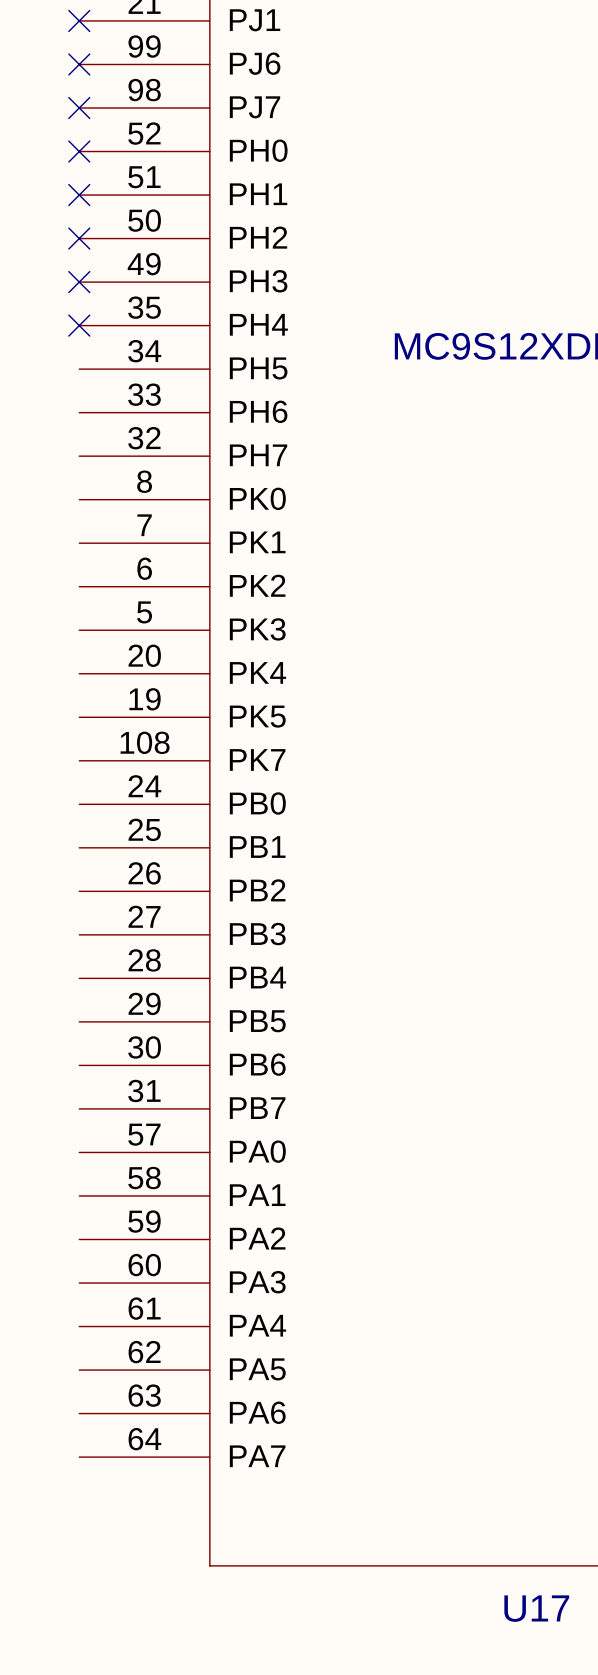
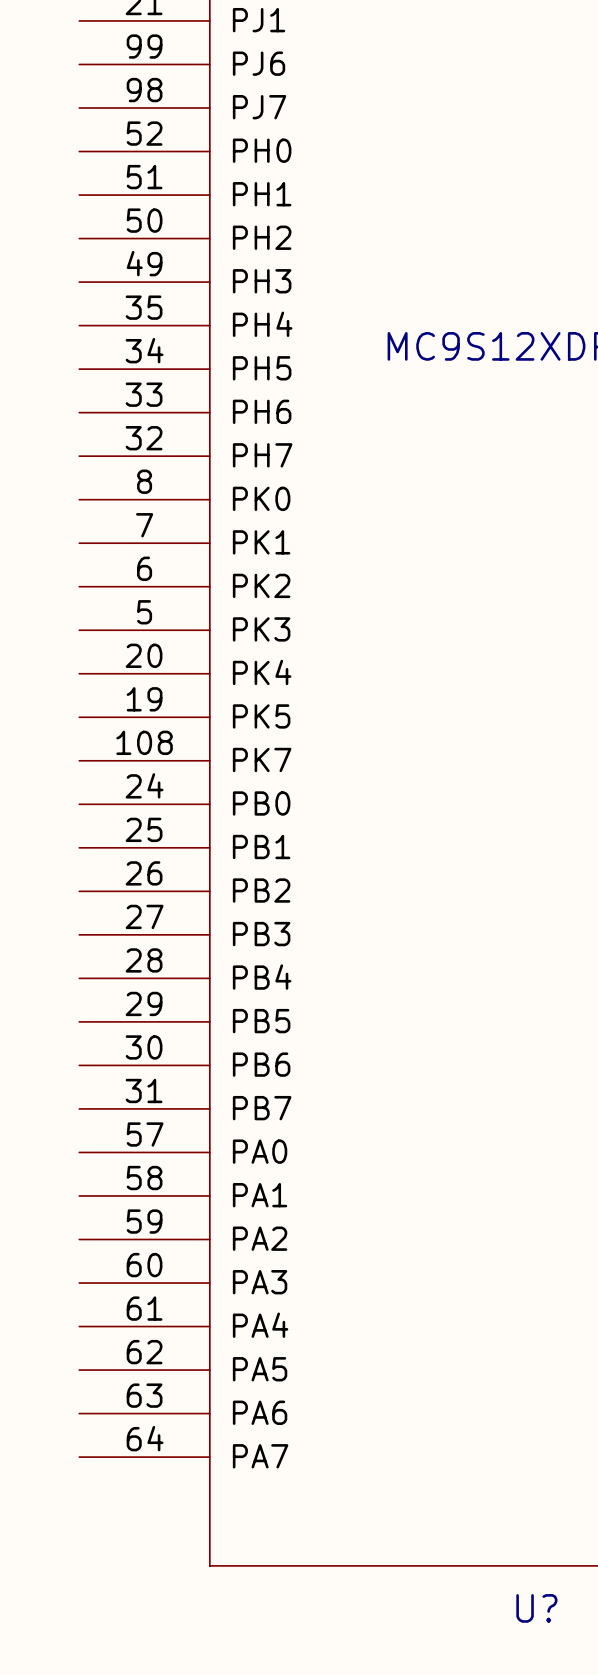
no-connect mark: (79, 20) -> none
no-connect mark: (79, 64) -> none
no-connect mark: (79, 108) -> none
no-connect mark: (79, 151) -> none
no-connect mark: (79, 195) -> none
no-connect mark: (79, 238) -> none
no-connect mark: (79, 282) -> none
no-connect mark: (79, 325) -> none
U17 name: U17 (536, 1608) -> U? (536, 1608)

